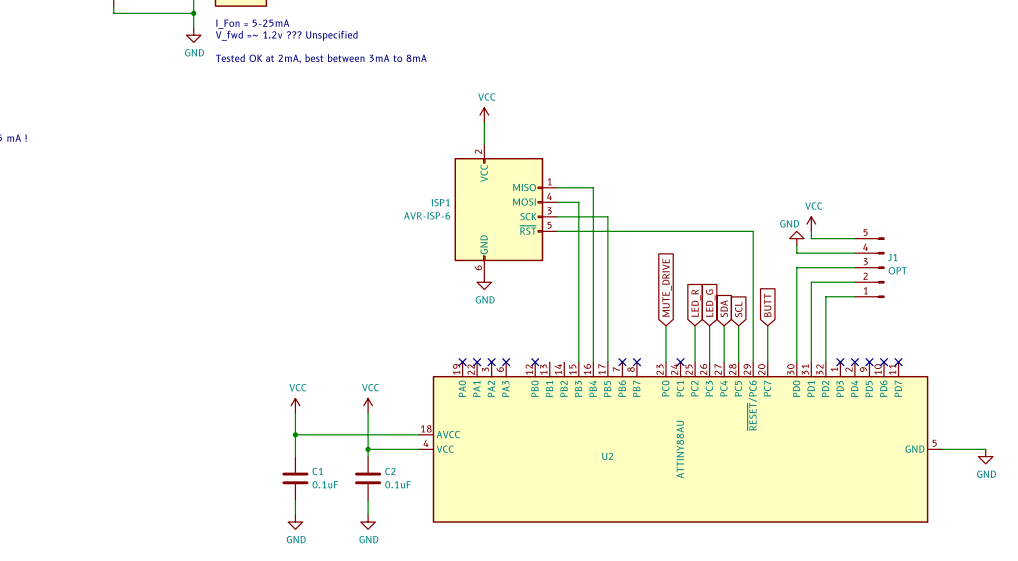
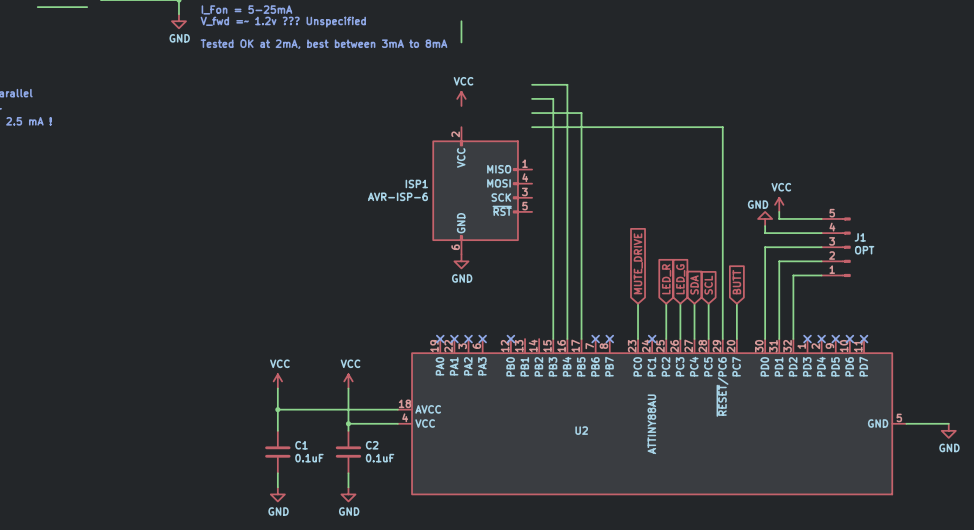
wire: none -> (37, 7) (87, 7)
wire: (484, 122) (484, 144) -> (461, 21) (461, 42)
wire: (557, 187) (593, 187) -> (532, 84) (567, 84) (567, 169)
wire: (557, 202) (578, 202) -> (532, 98) (553, 98) (553, 183)
wire: (557, 216) (607, 216) -> (532, 113) (581, 113) (581, 197)
wire: (557, 231) (753, 231) -> (532, 127) (722, 127) (722, 211)

